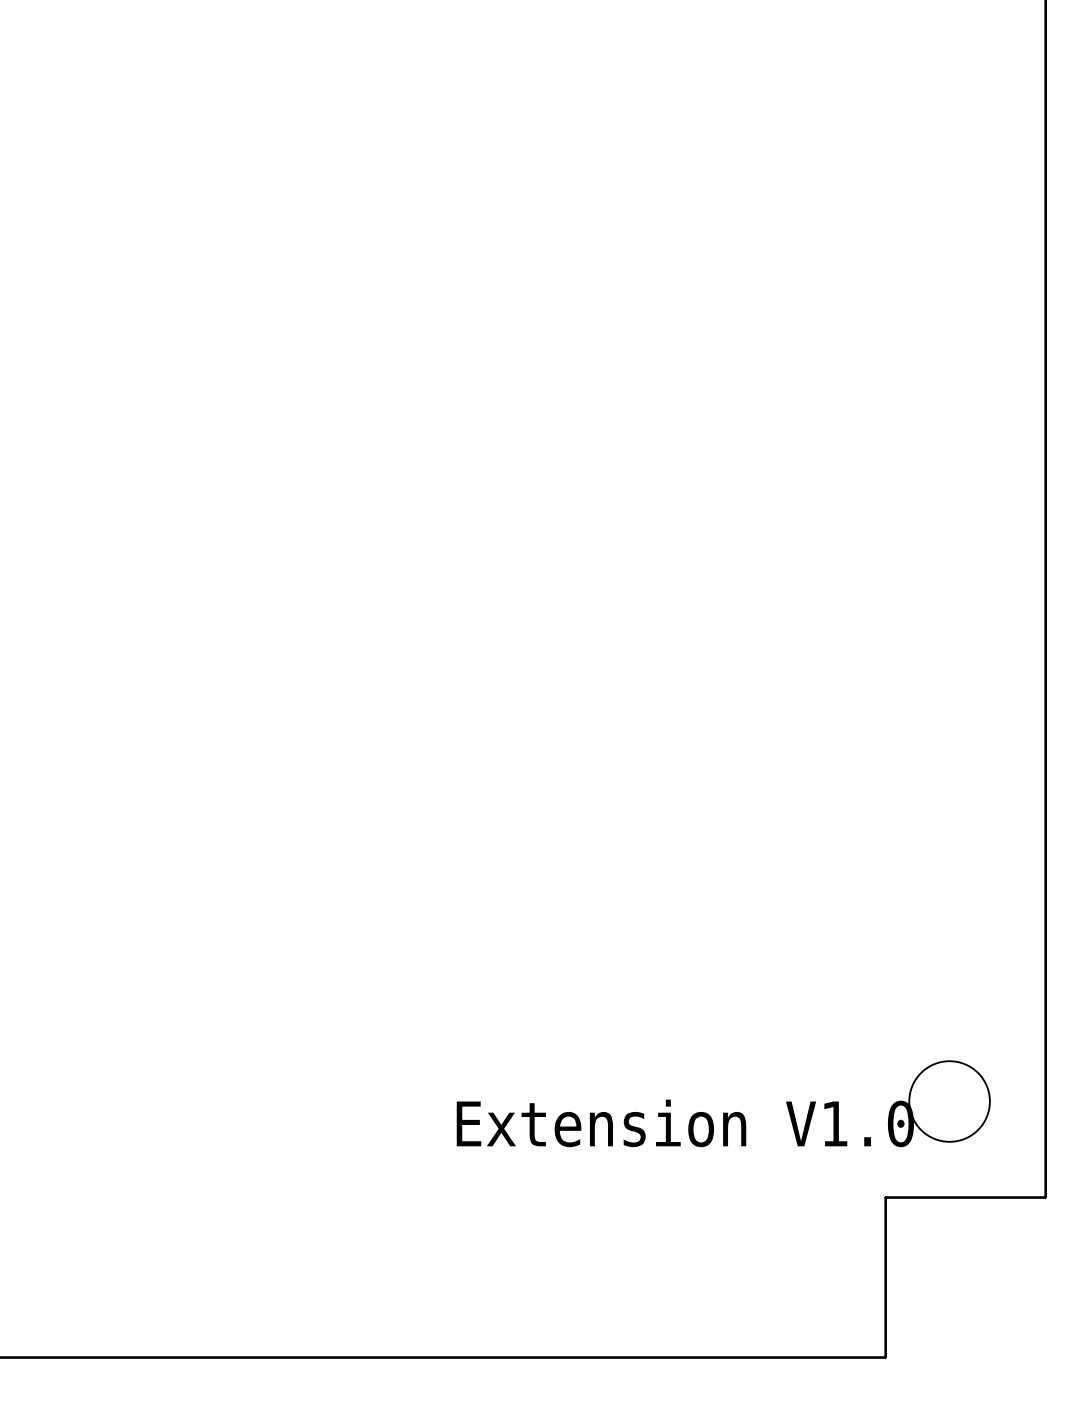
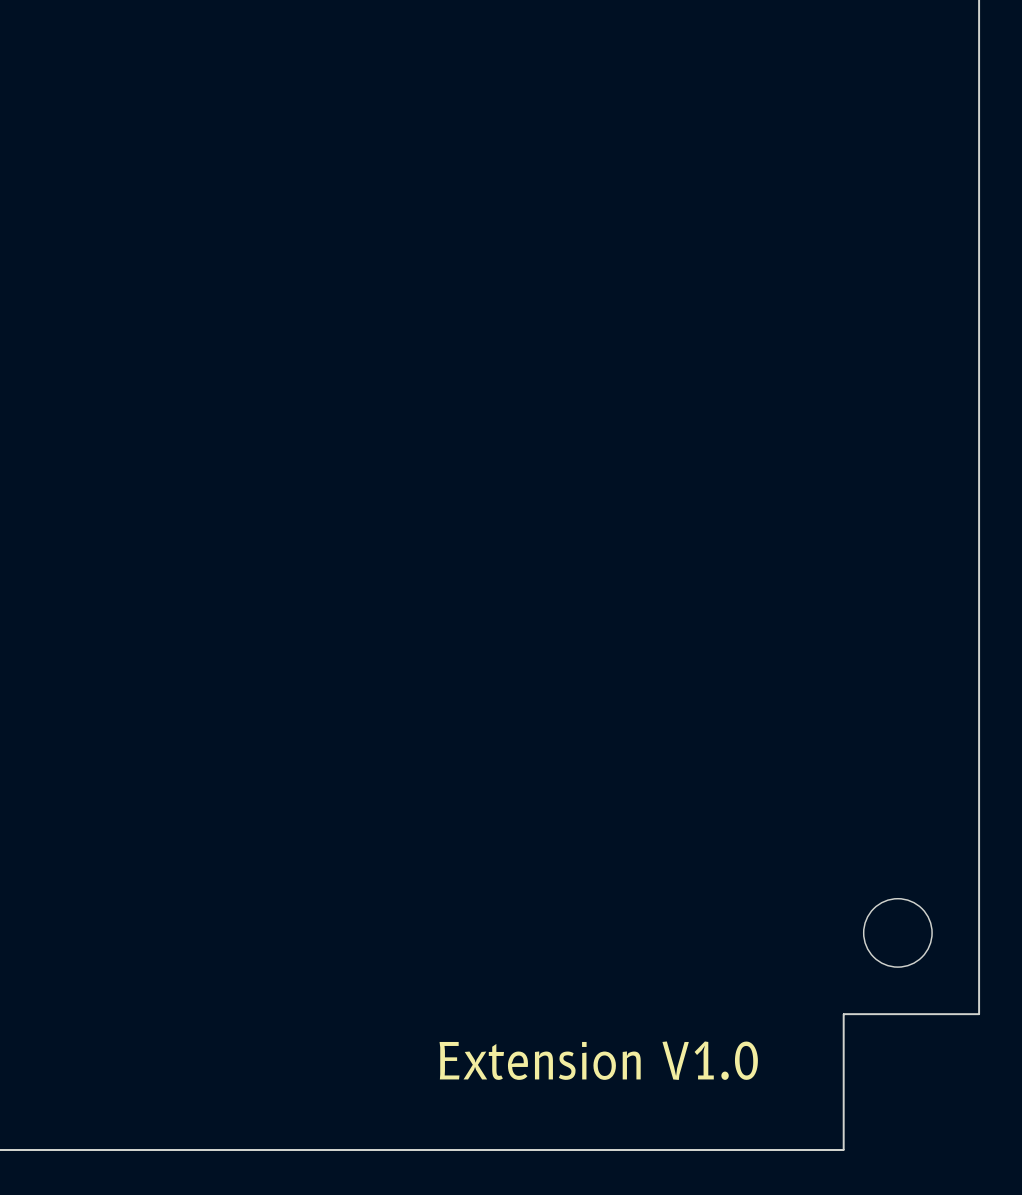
text position: Extension V1.0 (685, 1123) -> Extension V1.0 (598, 1060)

